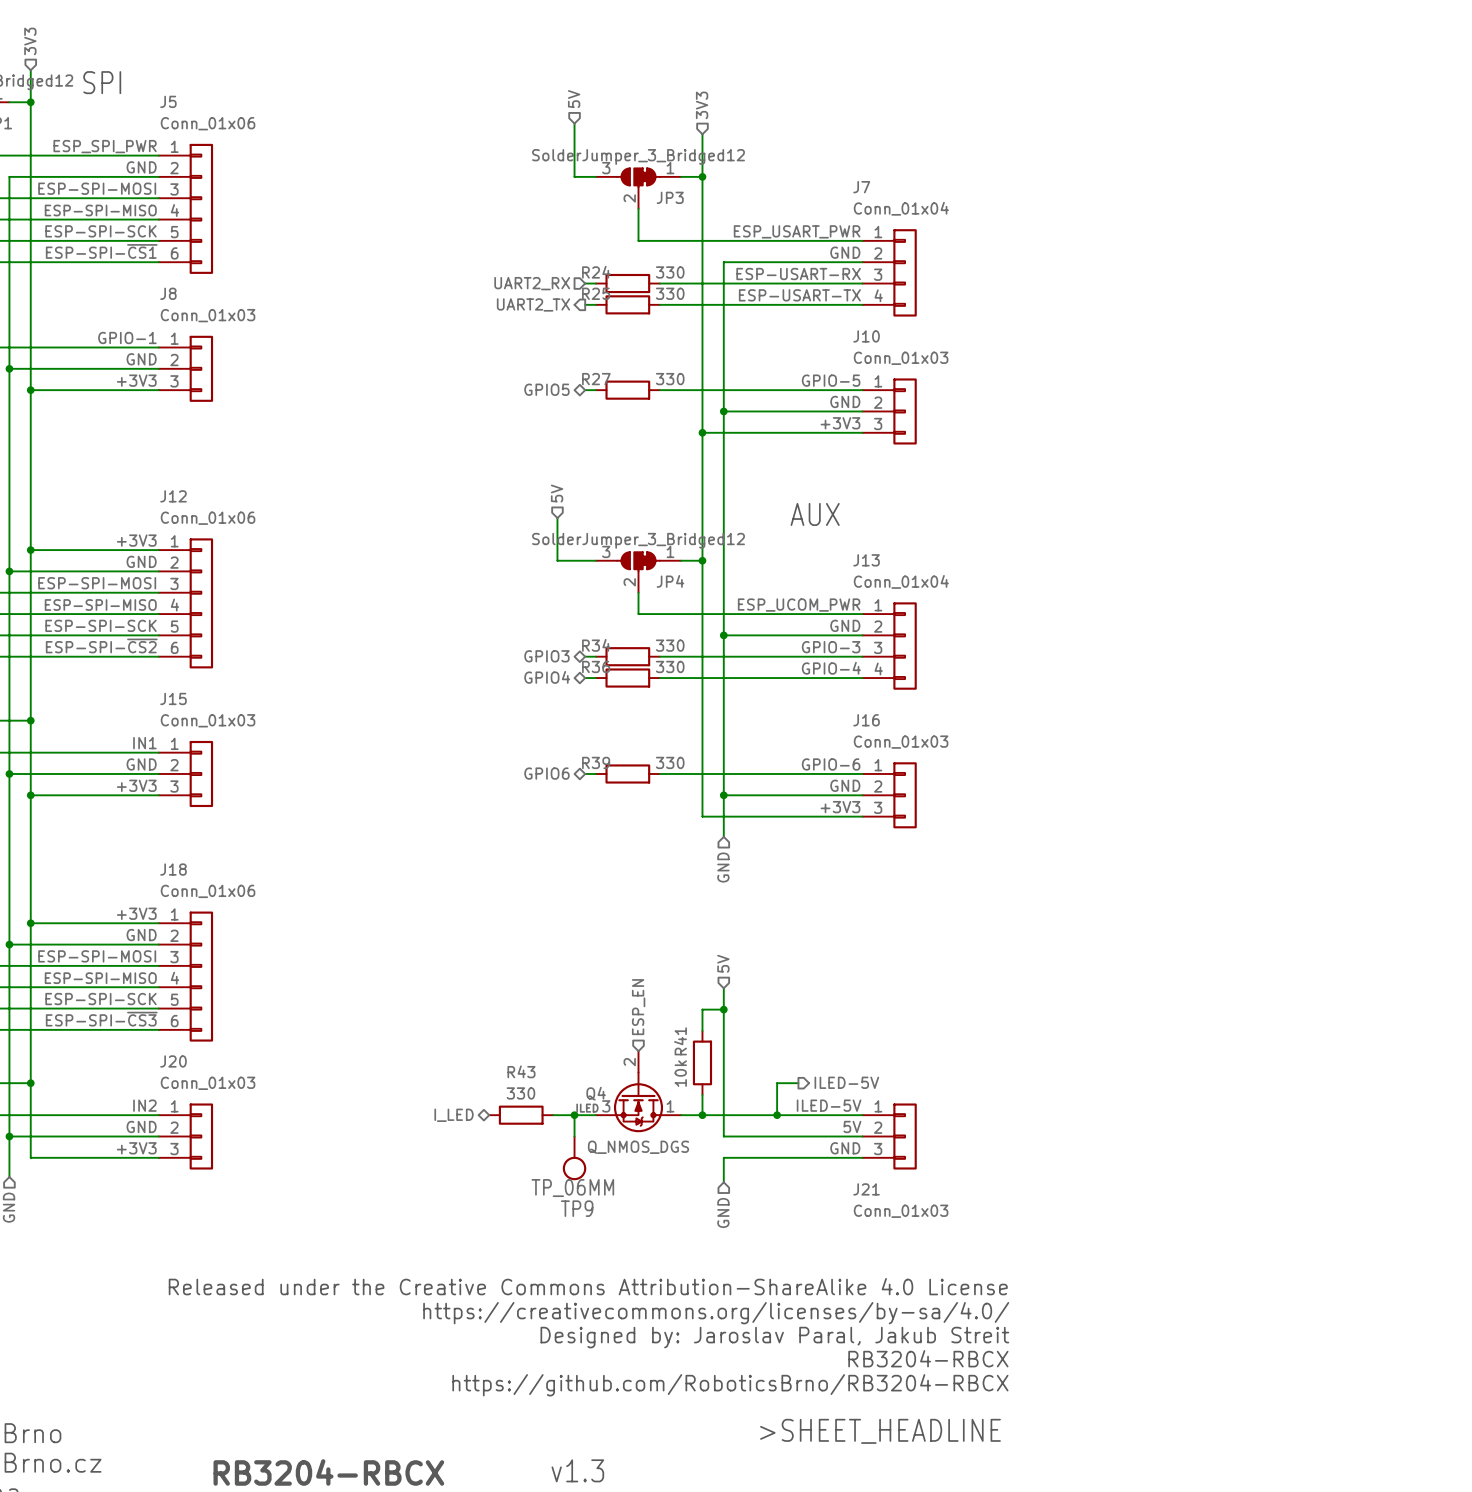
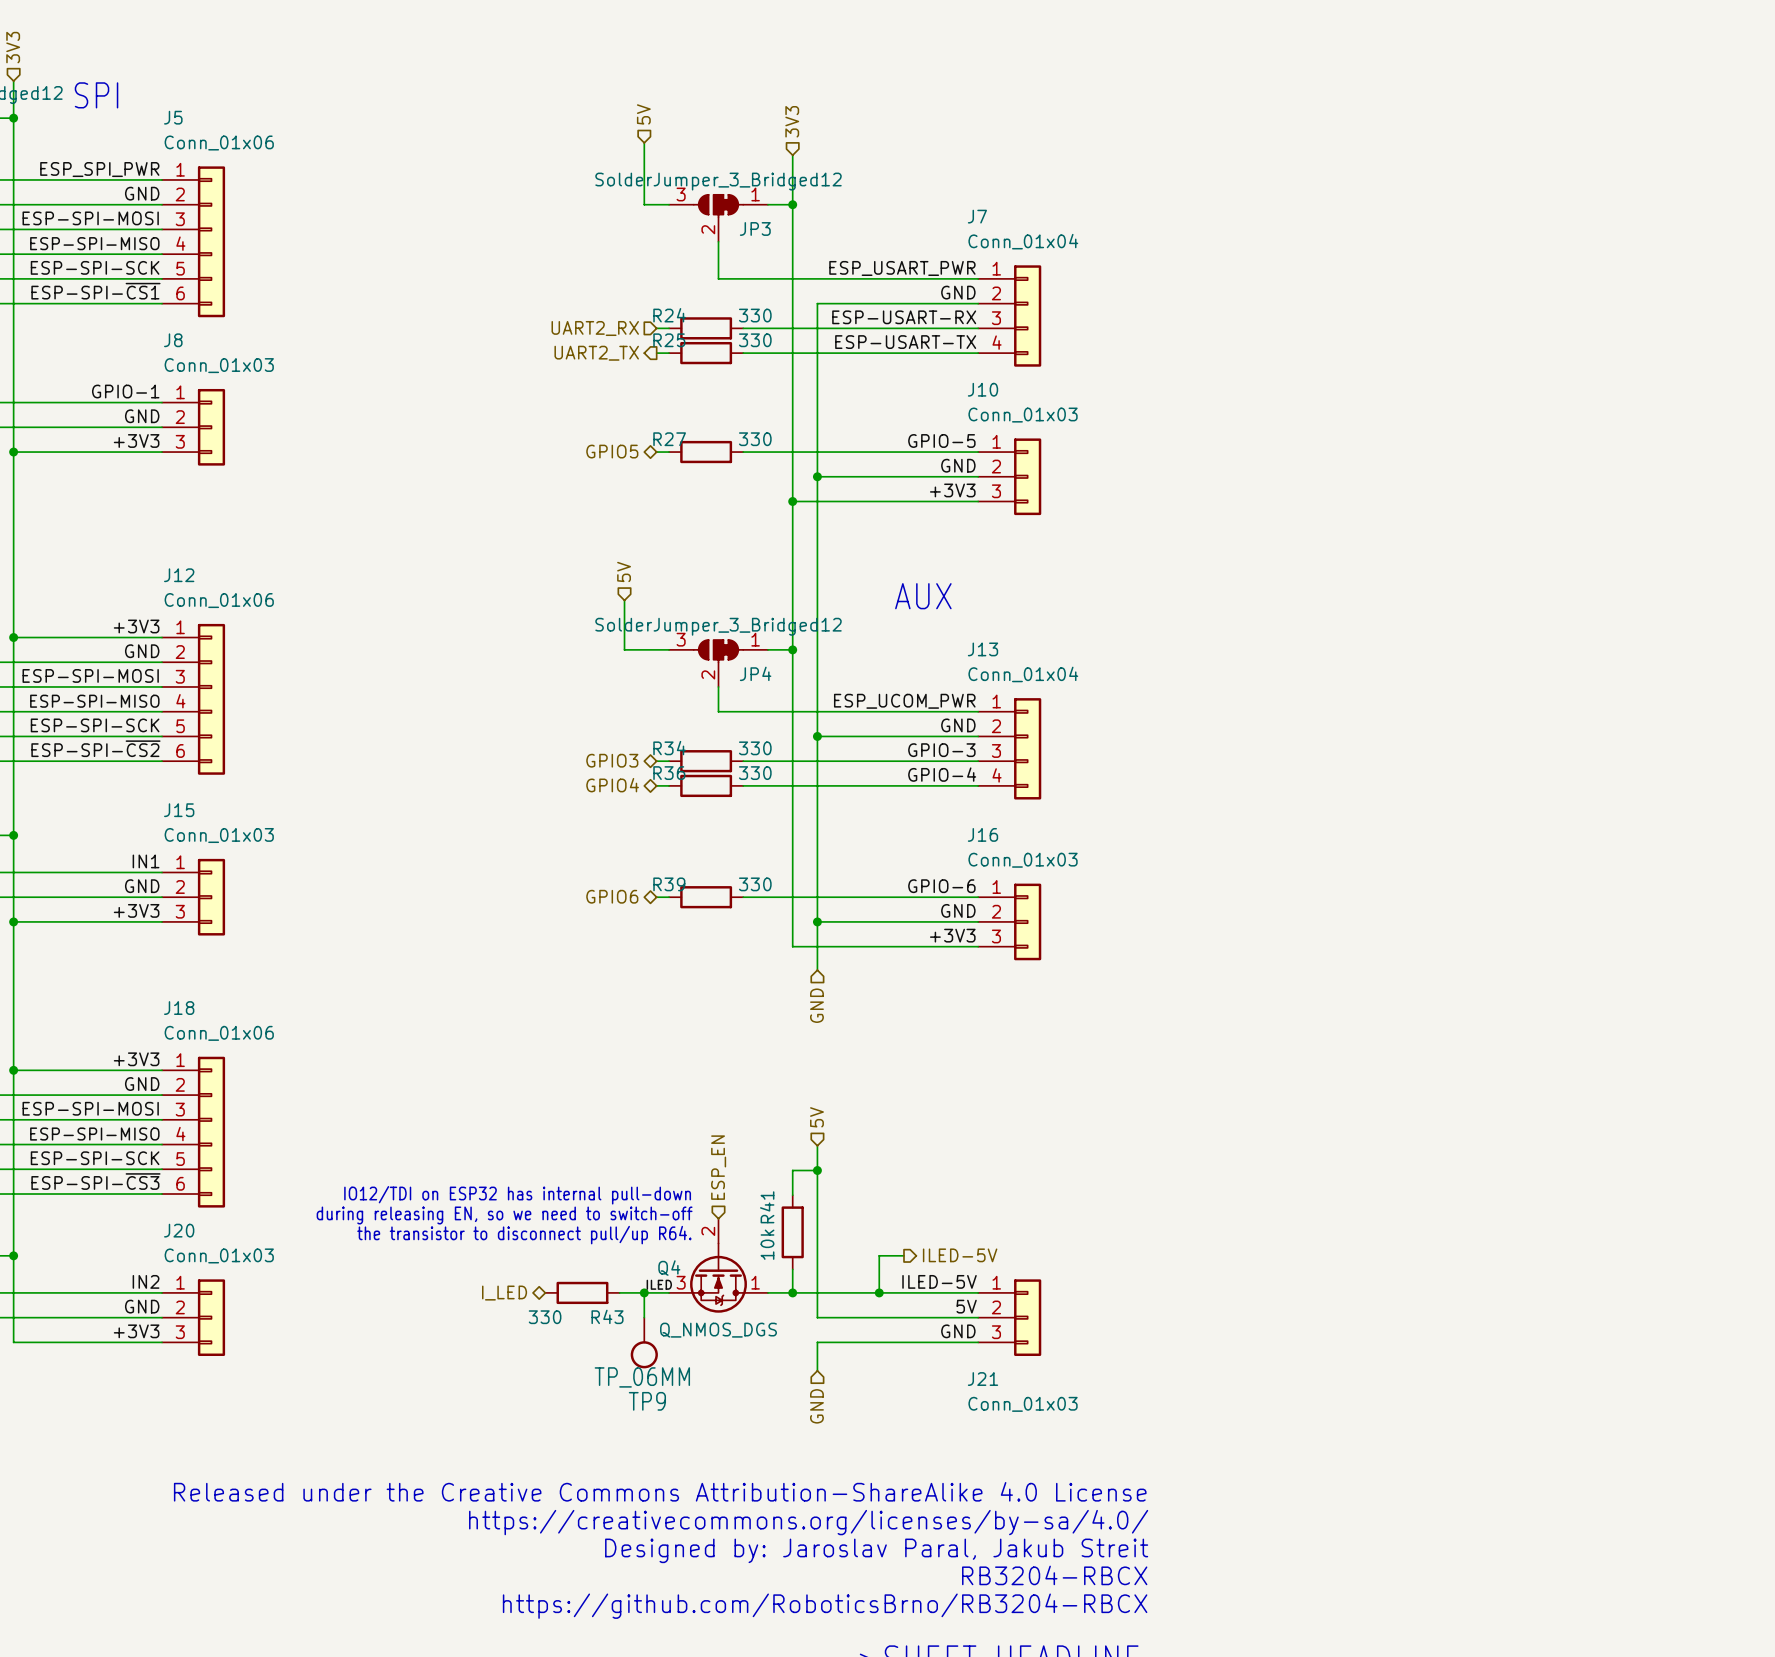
text: none -> IO12/TDI on ESP32 has internal pull-down (517, 1195)
text: none -> during releasing EN, so we need to switch-off (504, 1215)
text: none -> the transistor to disconnect pull/up R64. (524, 1235)
R43 name position: R43 (521, 1071) -> R43 (607, 1316)
R43 value position: 330 (520, 1093) -> 330 (545, 1317)

